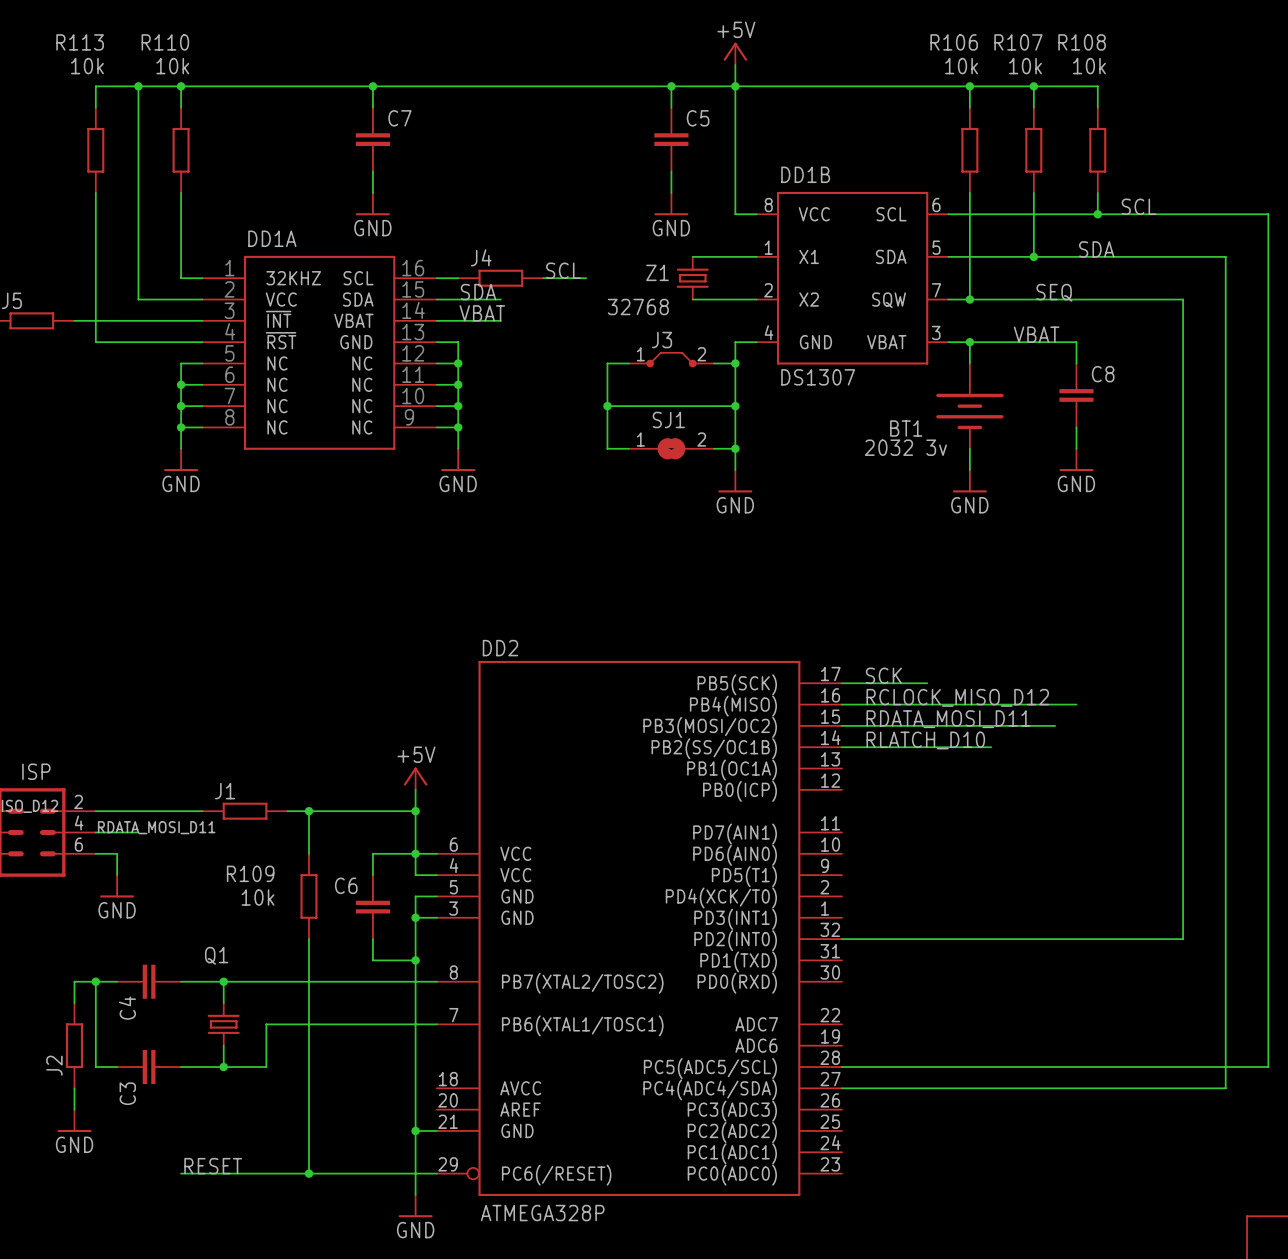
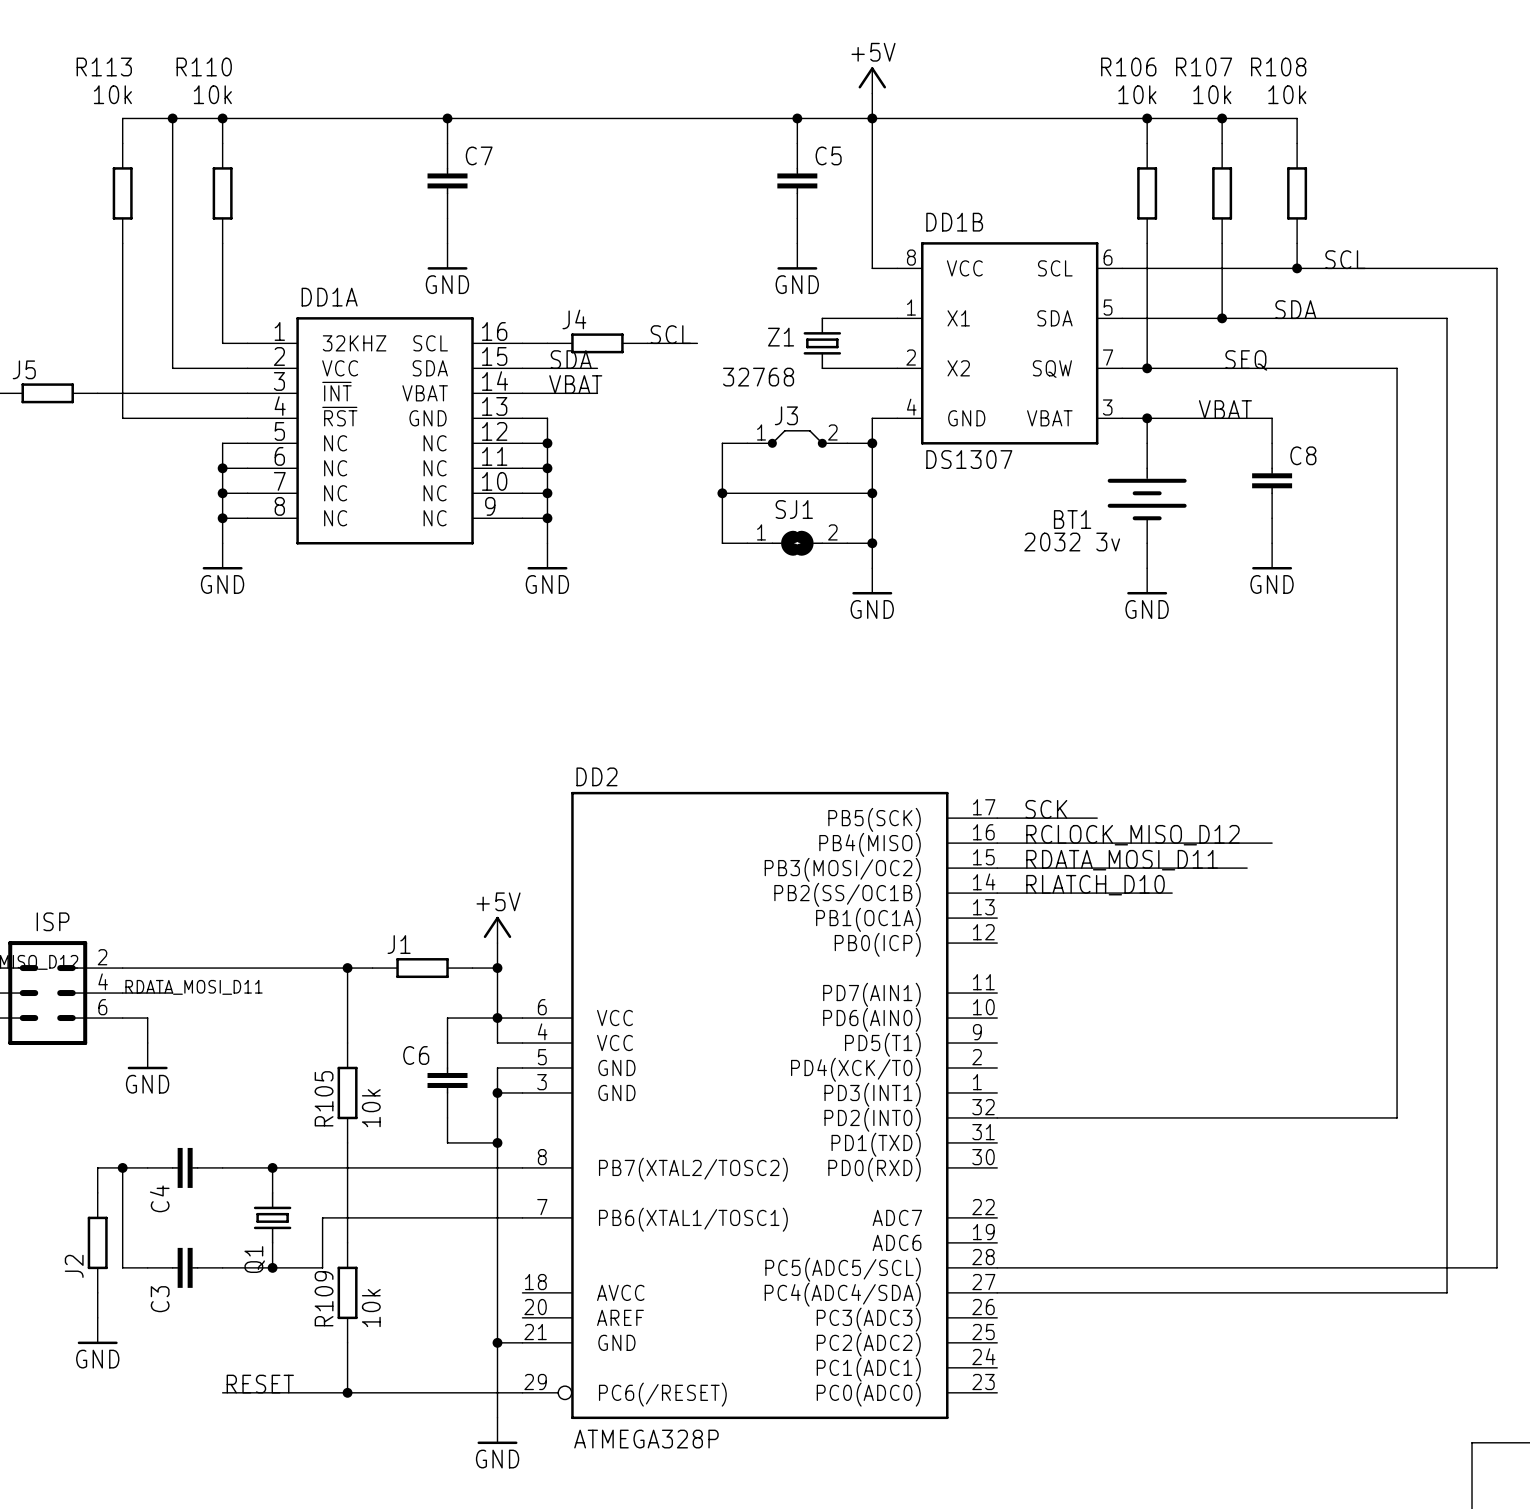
wire: none -> (247, 968) (347, 968) (347, 1043)
J1 position: (245, 811) -> (422, 968)
junction position: (308, 811) -> (347, 968)
wire: (394, 811) (308, 811) (308, 853) -> none
R109 name rotation: 0° (250, 873) -> 90° counterclockwise (324, 1298)
R109 position: (308, 896) -> (347, 1292)
R109 value rotation: 0° (258, 897) -> 90° counterclockwise (371, 1308)
R109 value position: 10k (258, 897) -> 10k (371, 1308)
R105: none -> 10k (347, 1092)
wire: (308, 939) (308, 1173) -> none
Q1 name rotation: 0° (216, 955) -> 90° counterclockwise (254, 1259)
Q1 name position: Q1 (216, 955) -> Q1 (254, 1259)
wire: none -> (347, 1142) (347, 1242)
wire: none -> (347, 1342) (347, 1392)
junction position: (308, 1173) -> (347, 1392)

